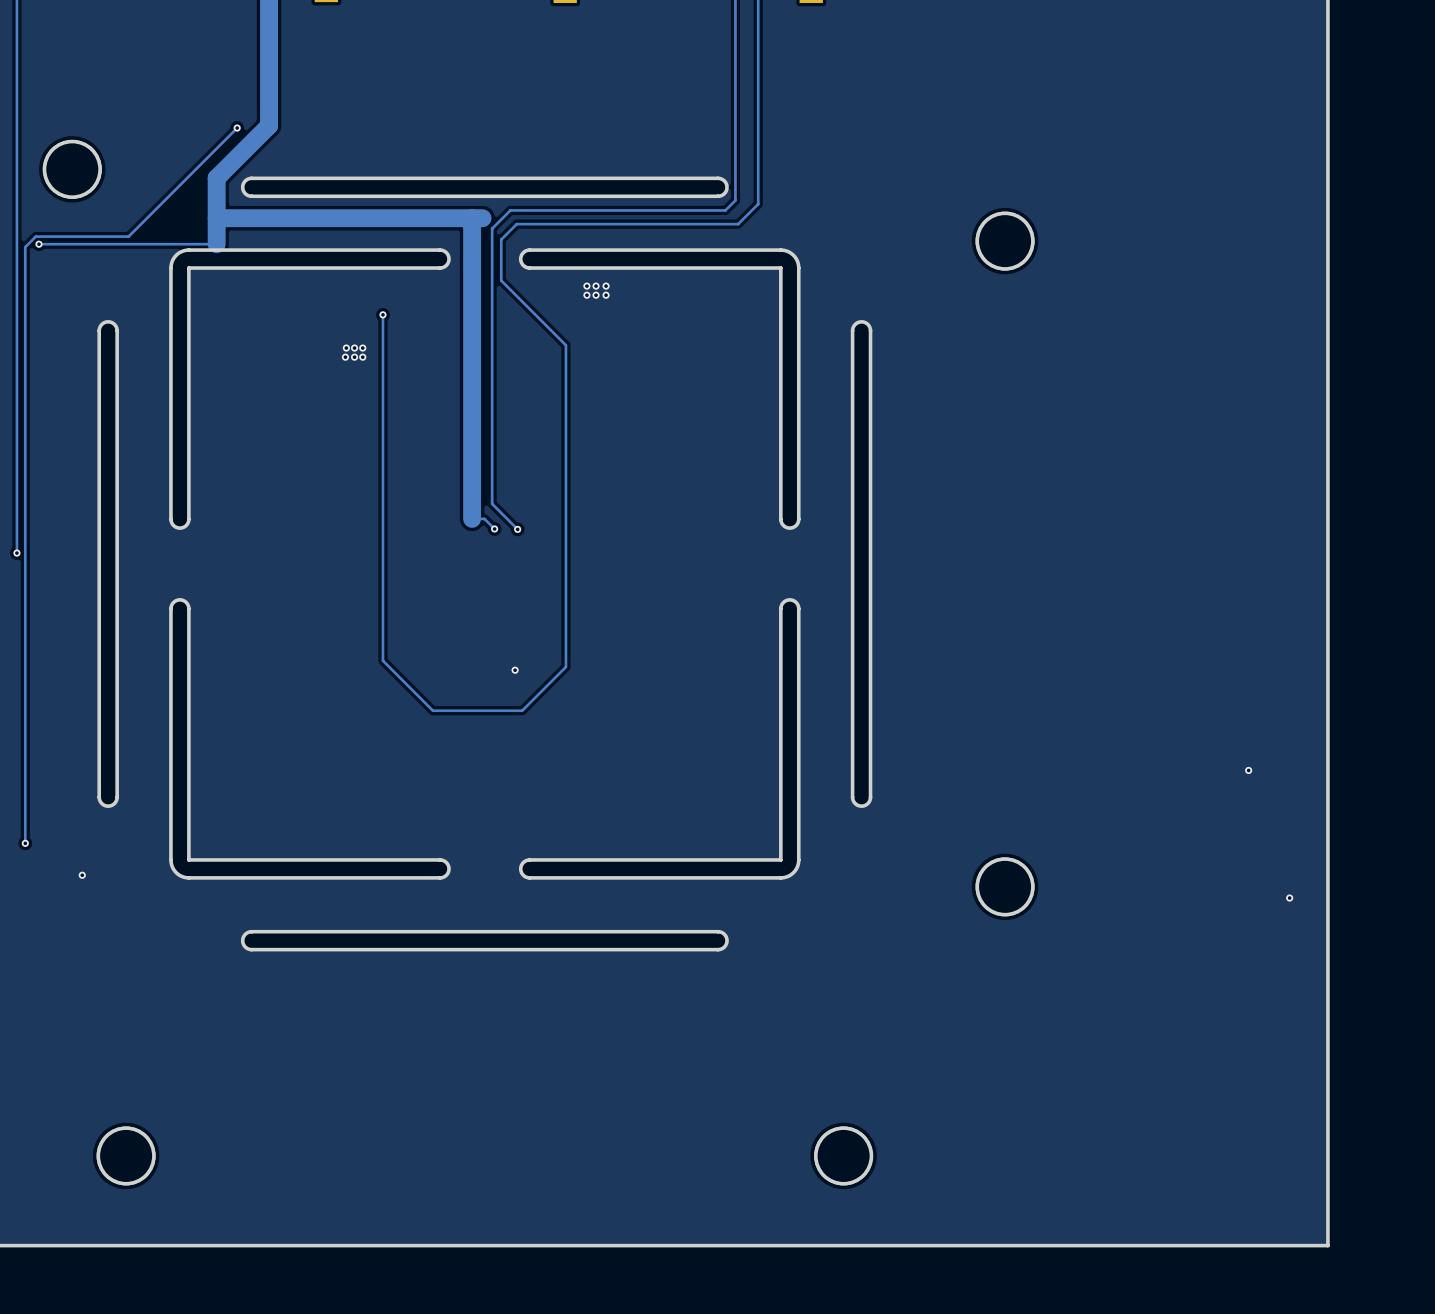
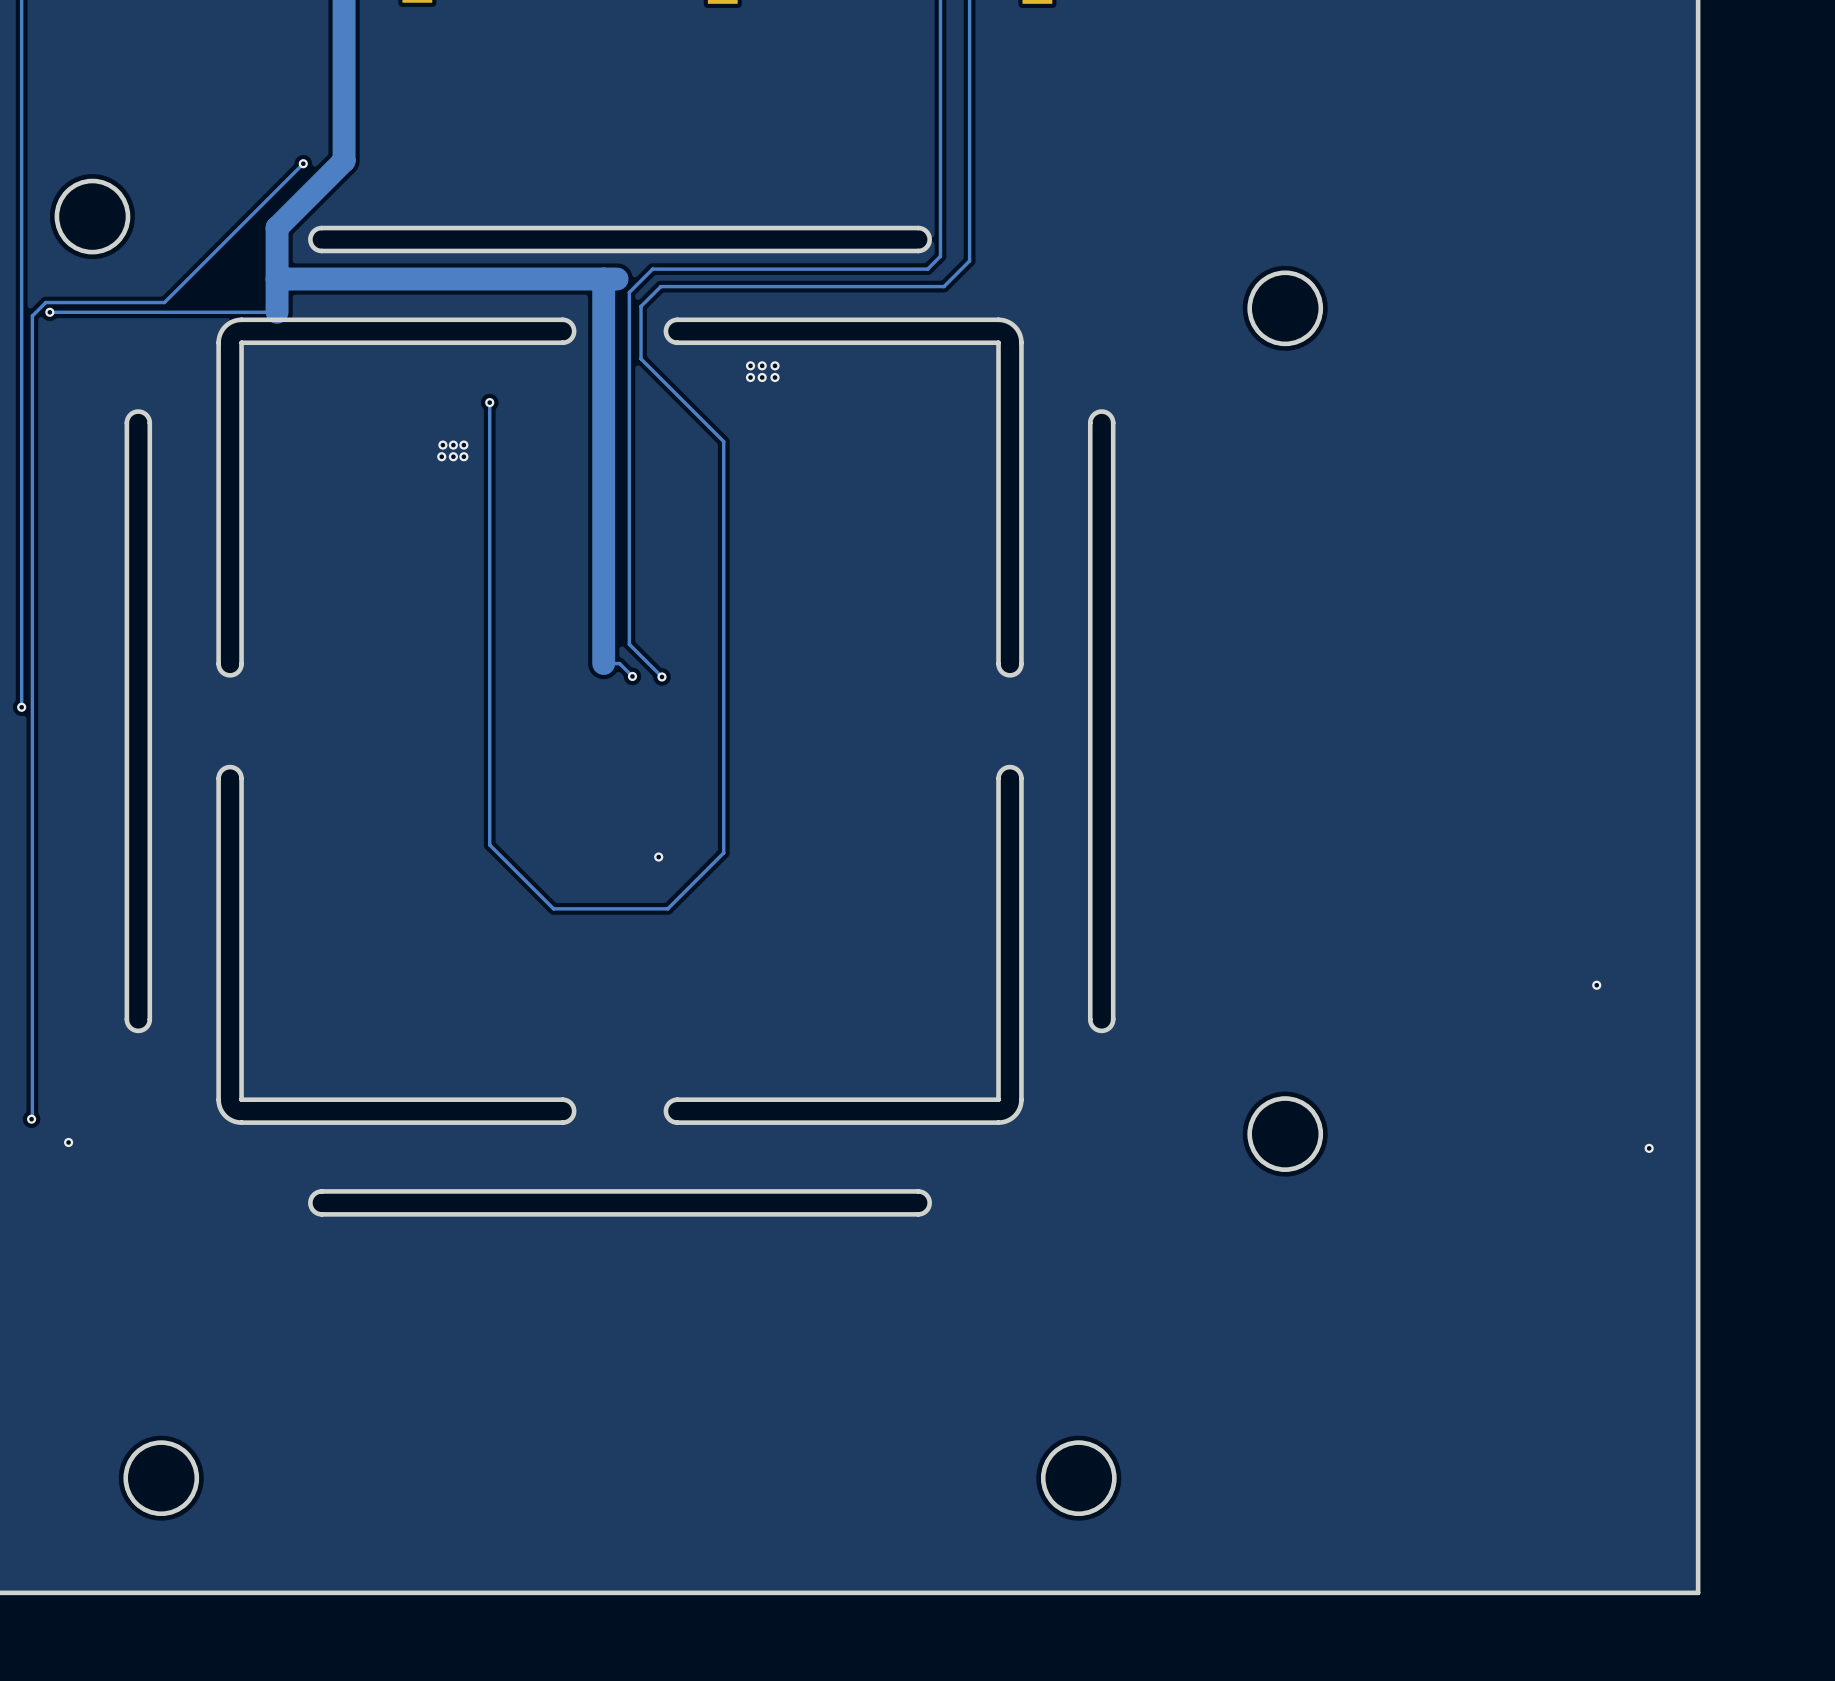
track: none -> (32, 1078) (31, 1119)
via: (25, 843) -> none
via: none -> (31, 1119)
via: (82, 875) -> none
via: none -> (68, 1142)

